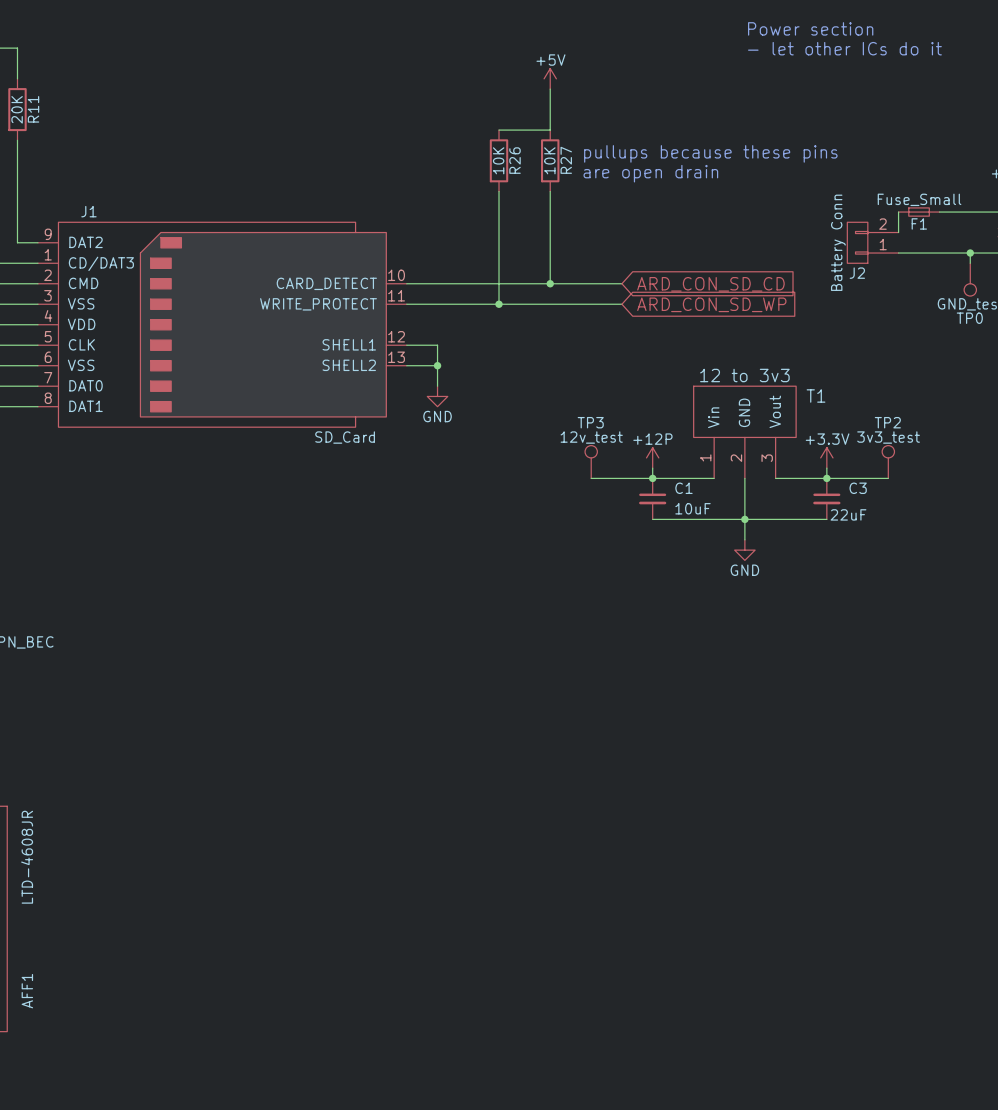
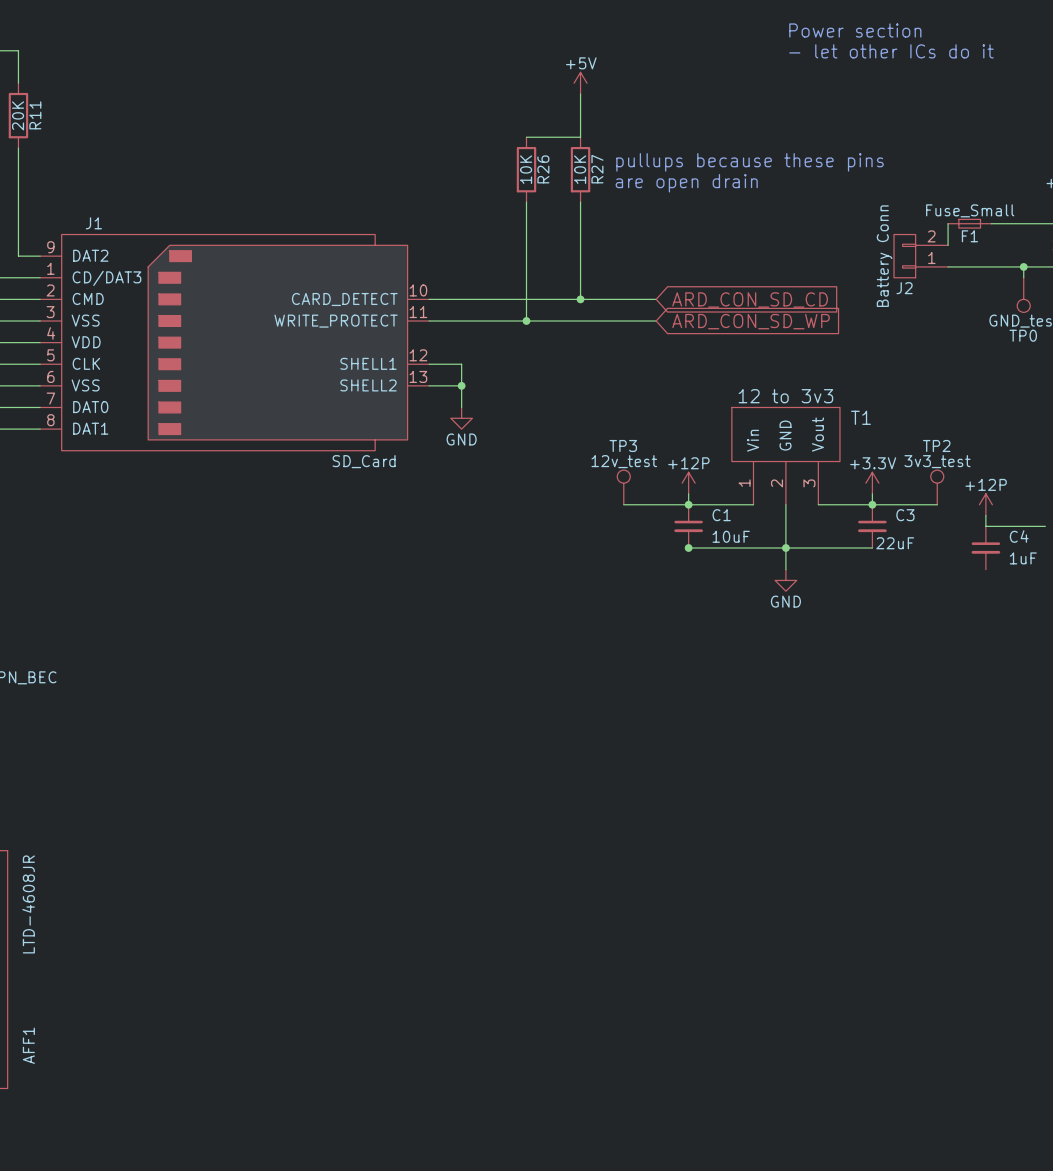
power symbol: none -> +12P (985, 504)
wire: none -> (985, 515) (985, 526) (1045, 526)
junction: none -> (688, 548)
C4: none -> 1uF (985, 548)

